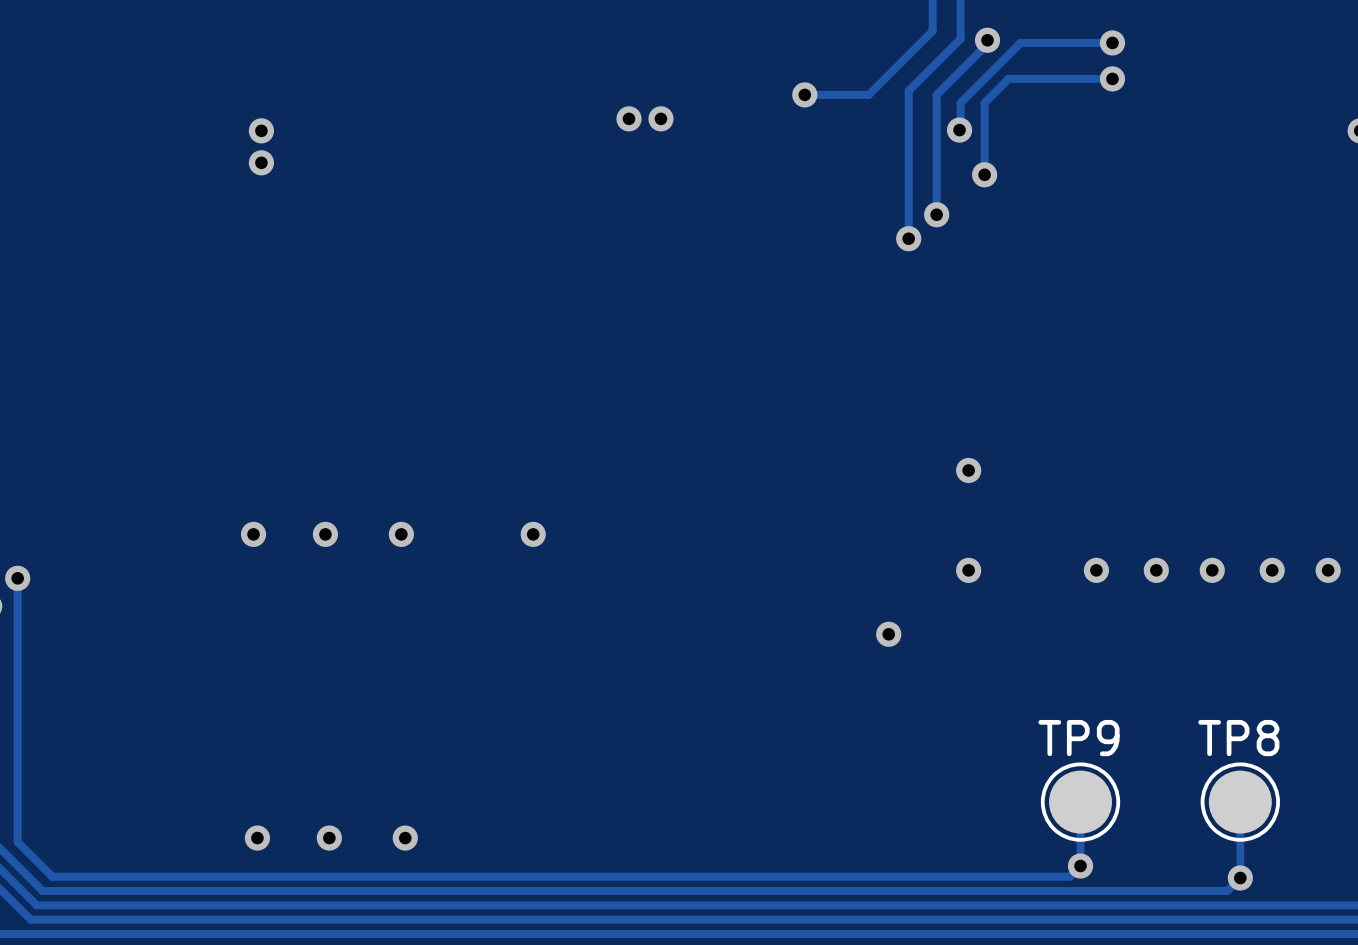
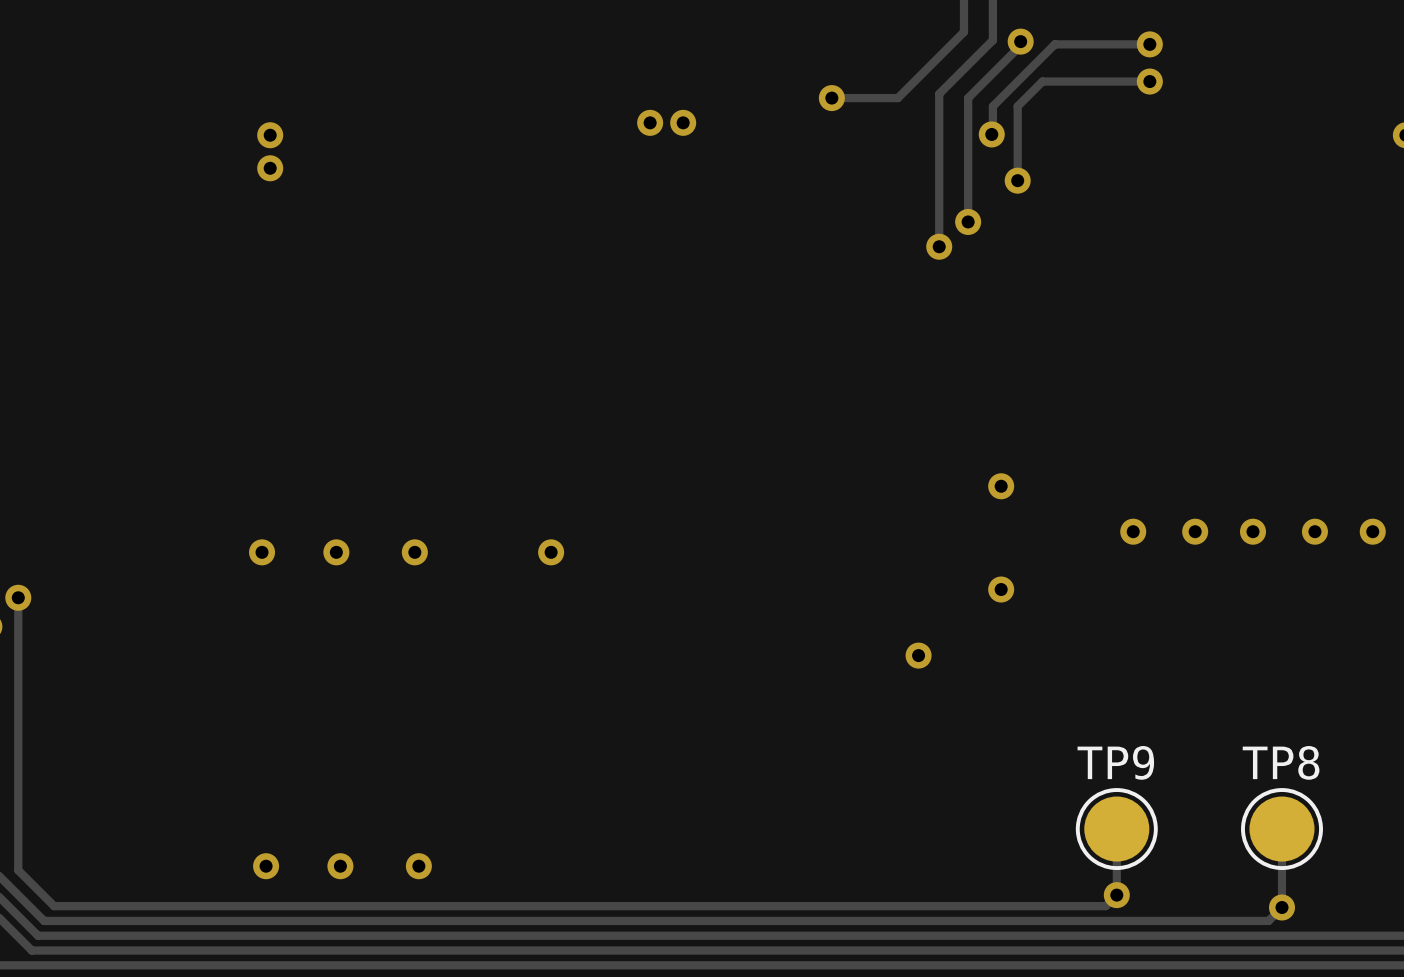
via: none -> (1133, 531)
via: none -> (1195, 531)
via: none -> (1253, 531)
via: none -> (1314, 531)
via: none -> (1372, 531)
via: (1096, 570) -> none
via: (1156, 570) -> none
via: (1212, 570) -> none
via: (1272, 570) -> none
via: (1328, 570) -> none

